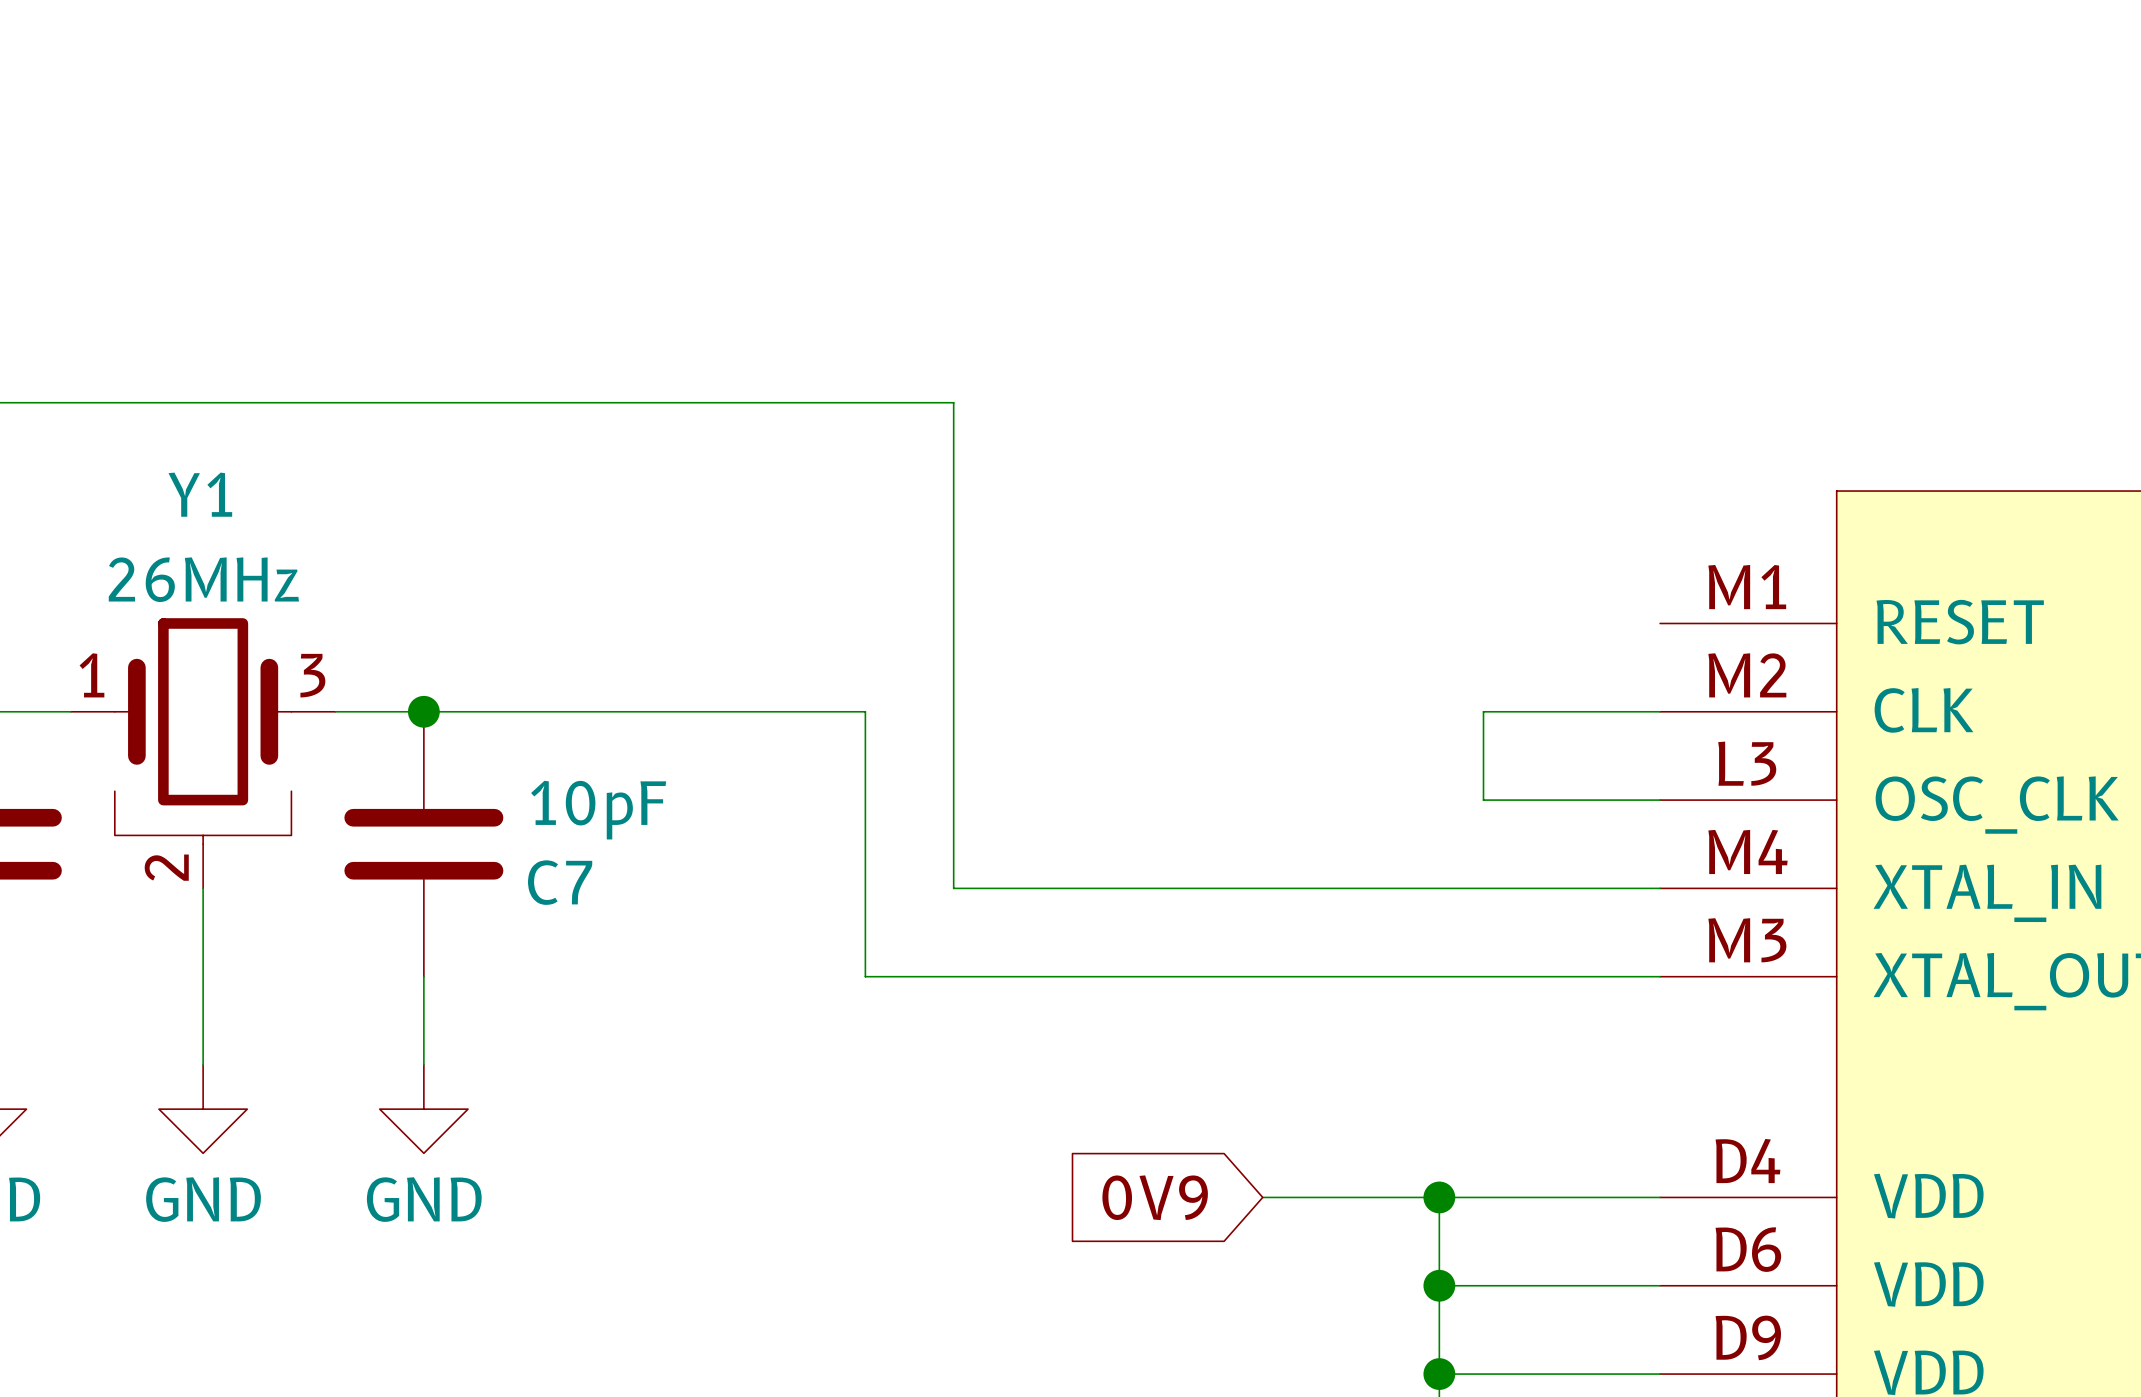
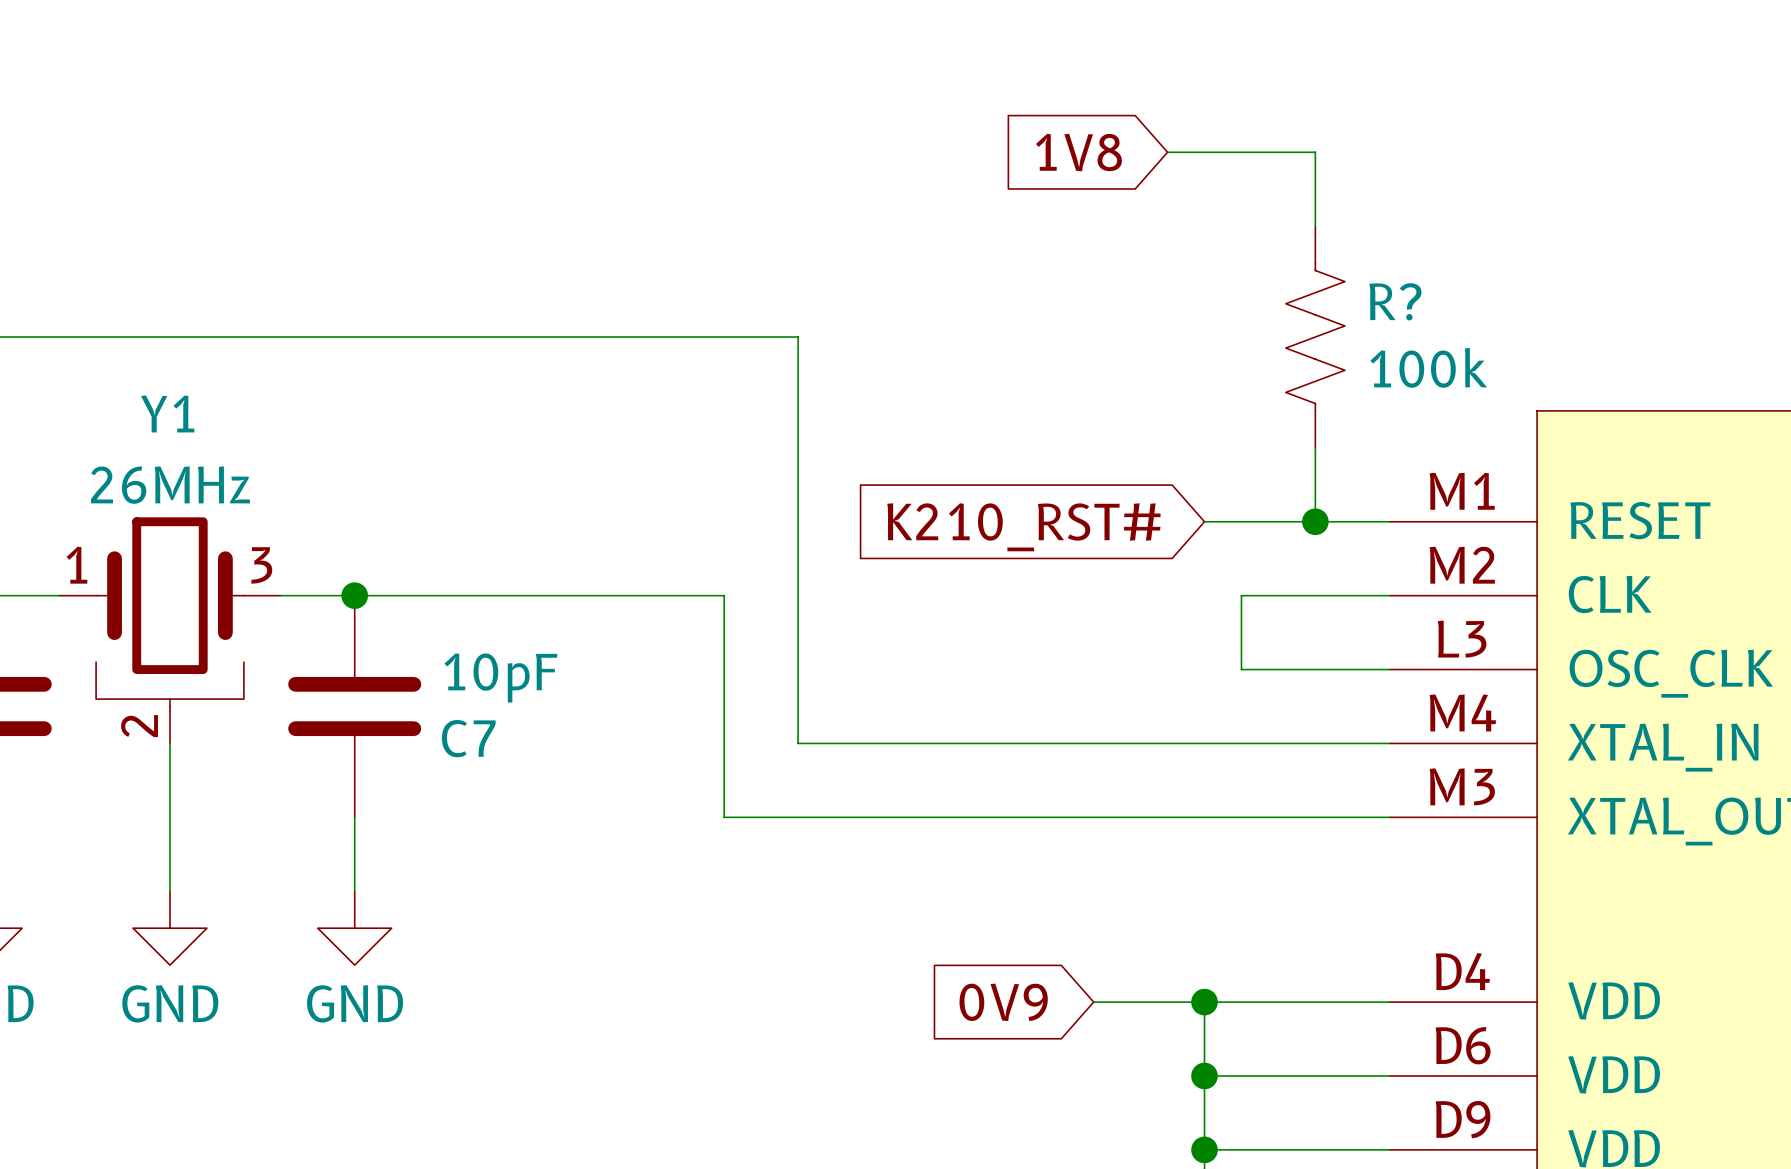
wire: none -> (1167, 152) (1315, 152) (1315, 226)
global label: none -> 1V8 (1078, 152)
R?: none -> 100k (1315, 337)
wire: none -> (1315, 447) (1315, 521)
wire: none -> (1204, 521) (1389, 521)
junction: none -> (1315, 521)
global label: none -> K210_RST# (1023, 527)
global label position: 0V9 (1155, 1197) -> 0V9 (1003, 1002)
wire: (1262, 1197) (1306, 1197) -> none

